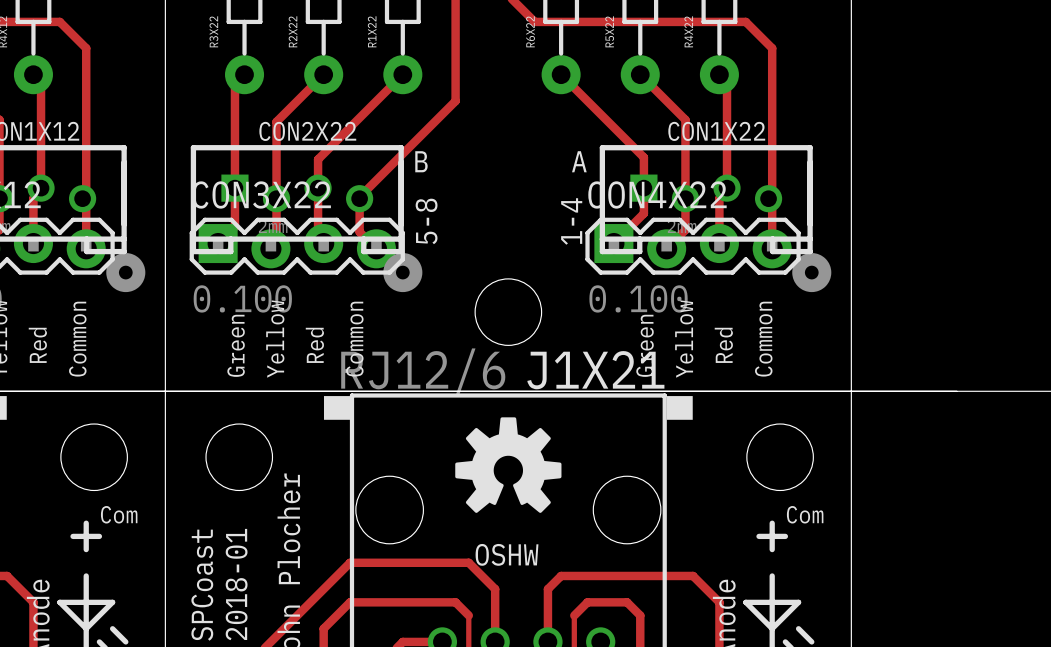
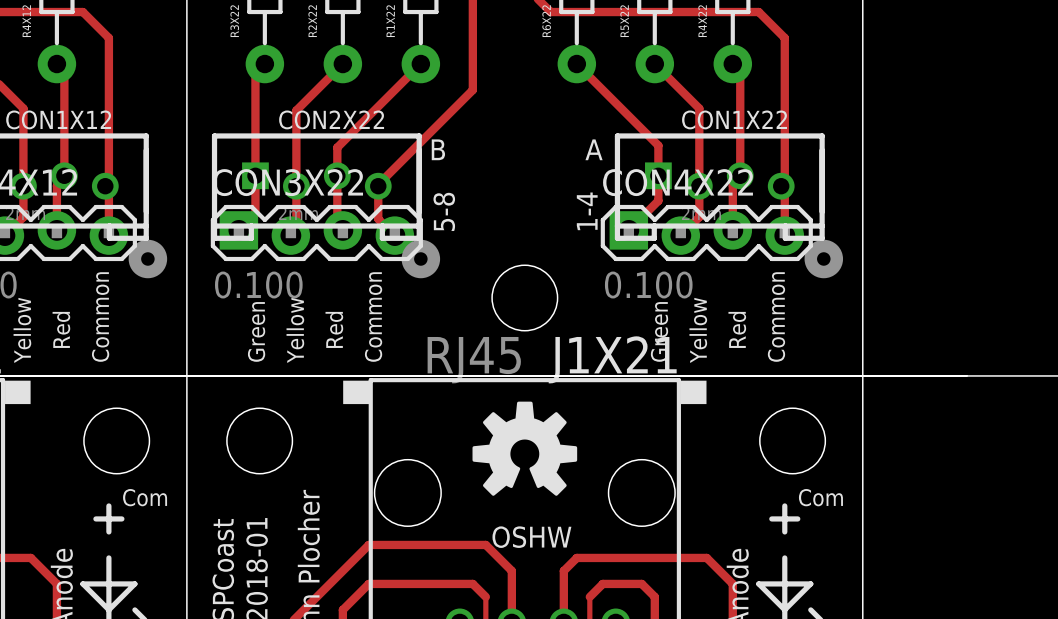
J1X21 value: RJ12/6 (423, 372) -> RJ45 (474, 360)

